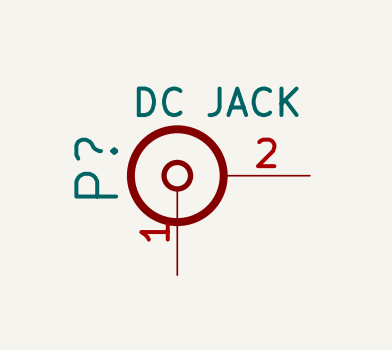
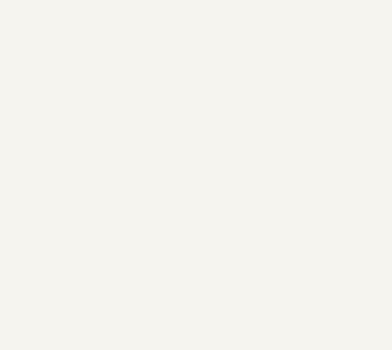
P?: DC JACK (218, 200) -> none

